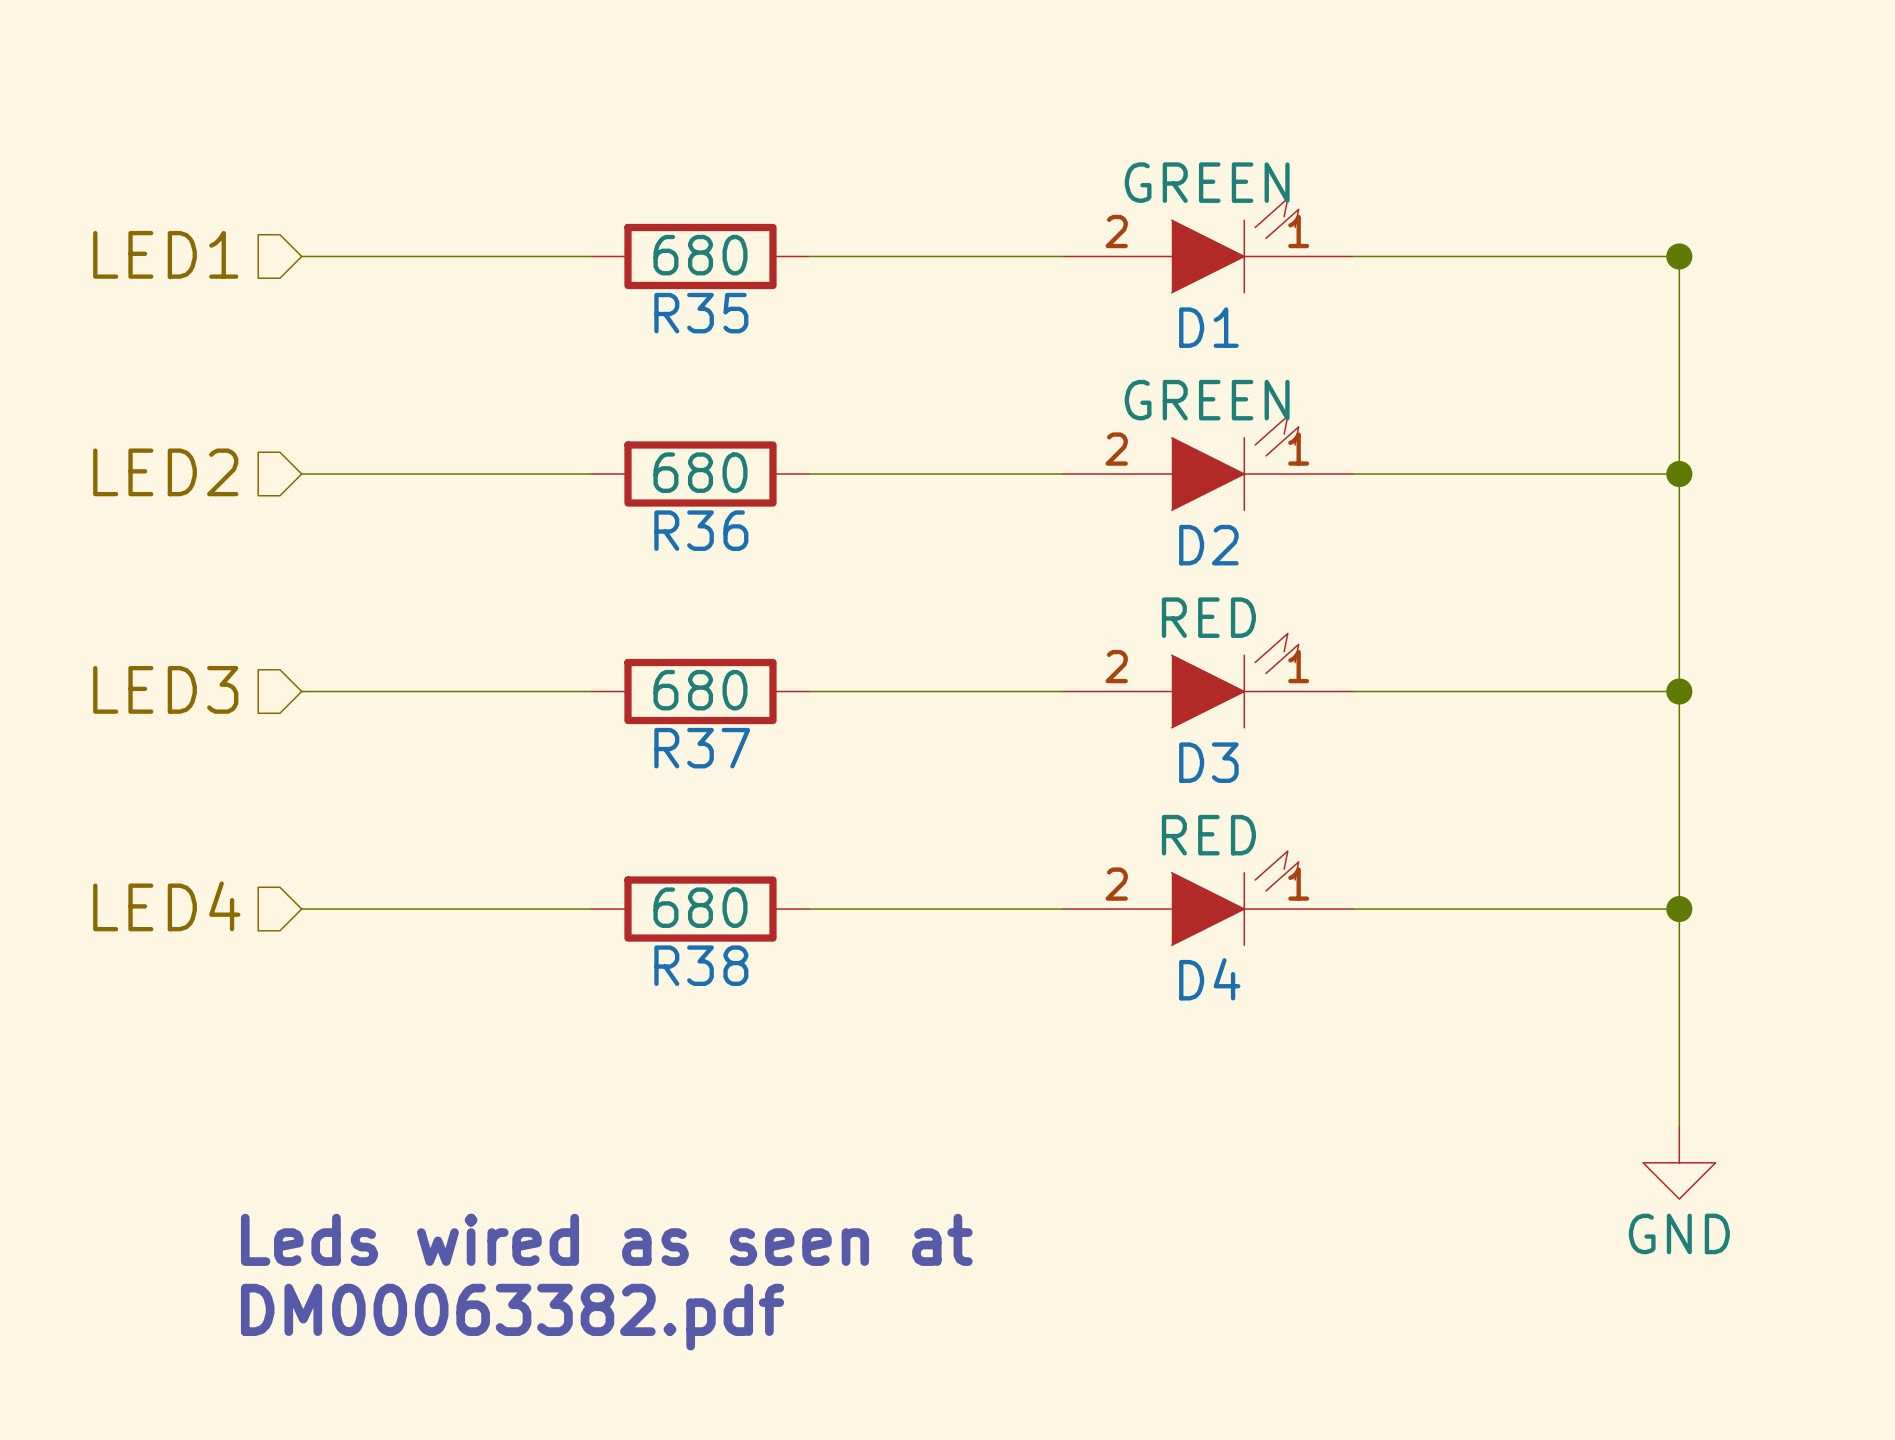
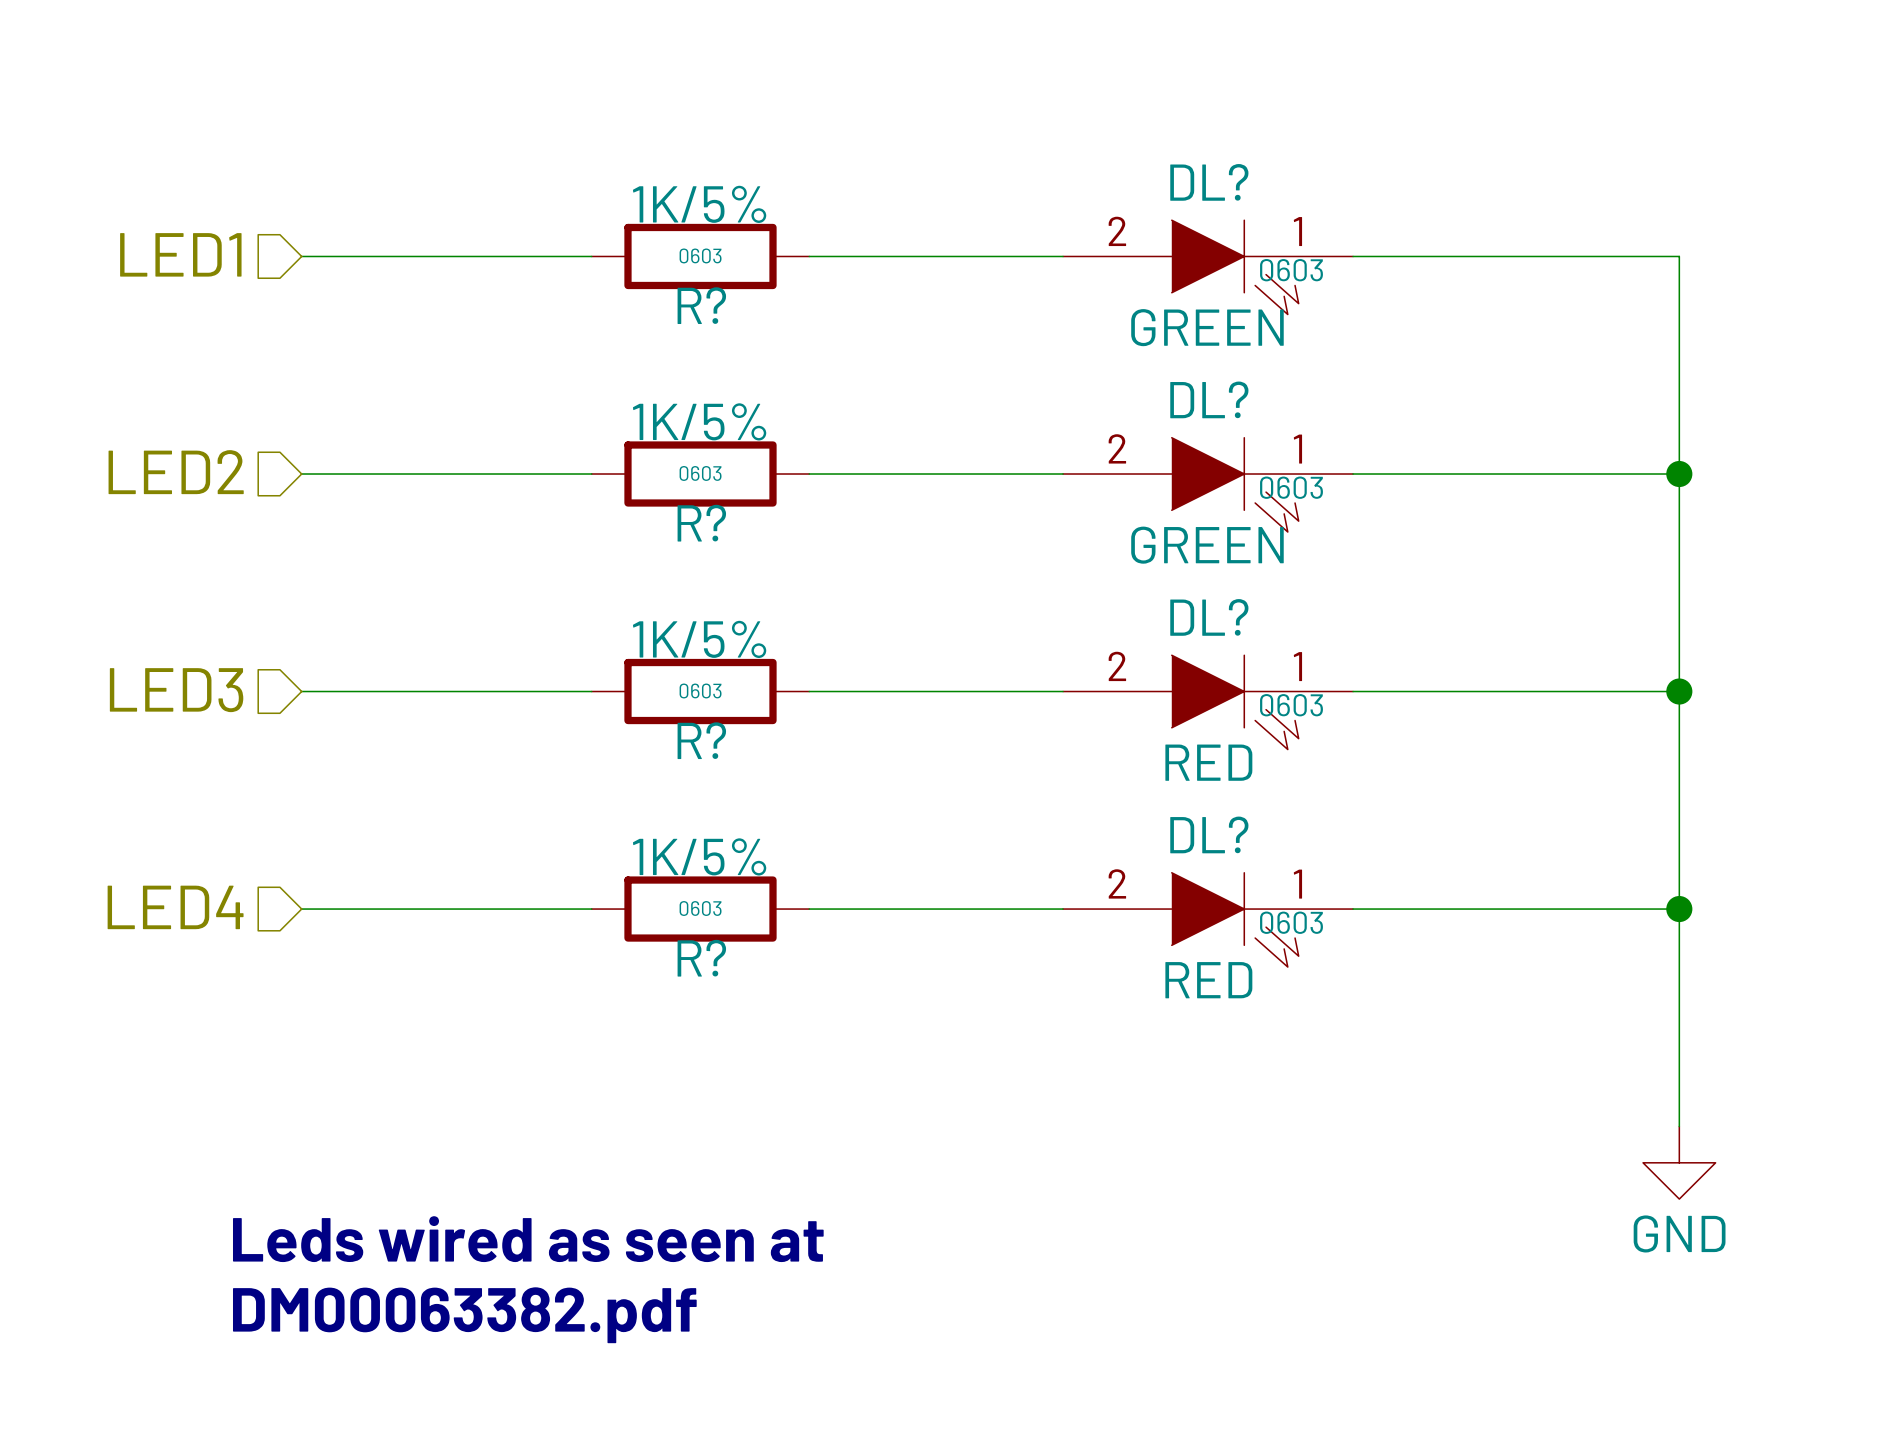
D1: GREEN (1208, 245) -> none
R35 text: none -> 0603 (700, 255)
R35 value: 680 (700, 255) -> 1K/5% (699, 204)
junction: (1679, 256) -> none
DL?: none -> GREEN (1208, 267)
R35 name: R35 (701, 313) -> R? (701, 305)
D2: GREEN (1208, 463) -> none
R36 value: 680 (700, 472) -> 1K/5% (699, 421)
R36 text: none -> 0603 (700, 473)
DL?: none -> GREEN (1208, 484)
R36 name: R36 (701, 530) -> R? (701, 523)
D3: RED (1208, 680) -> none
R37 text: none -> 0603 (700, 690)
R37 value: 680 (700, 690) -> 1K/5% (699, 639)
DL?: none -> RED (1208, 702)
R37 name: R37 (702, 748) -> R? (701, 740)
D4: RED (1208, 898) -> none
R38 value: 680 (700, 907) -> 1K/5% (699, 856)
R38 text: none -> 0603 (700, 908)
DL?: none -> RED (1208, 919)
R38 name: R38 (701, 965) -> R? (701, 958)

